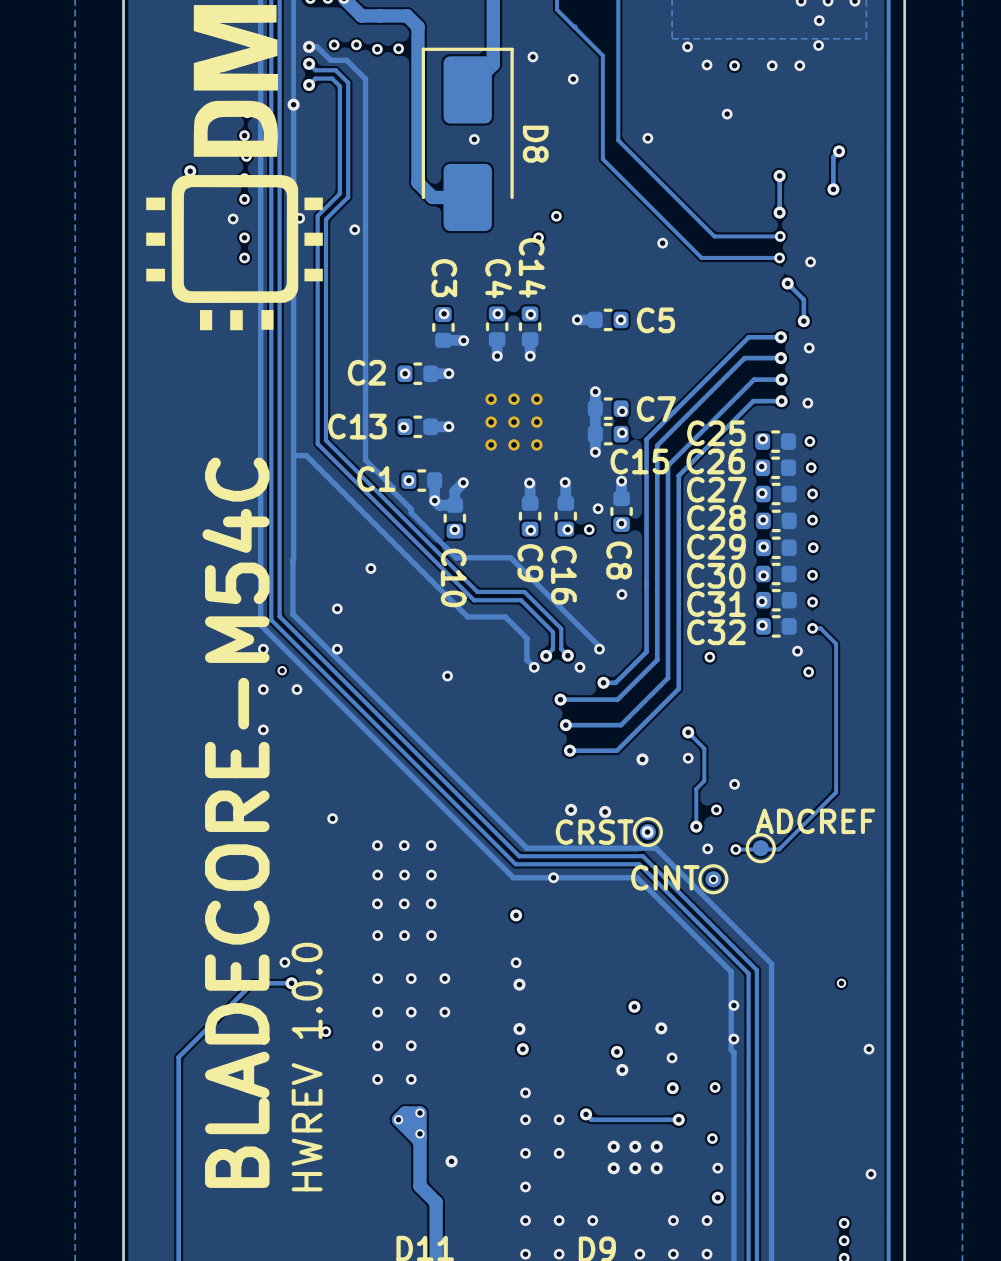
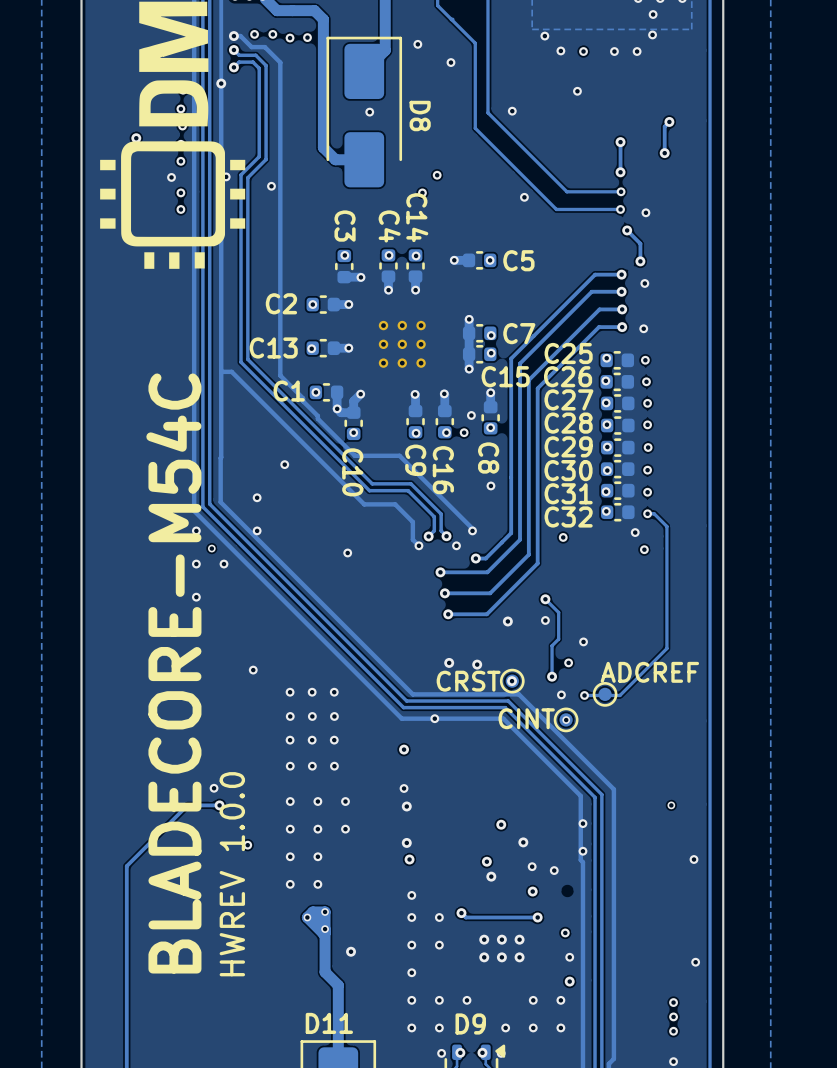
via position: (715, 1087) -> (554, 870)

